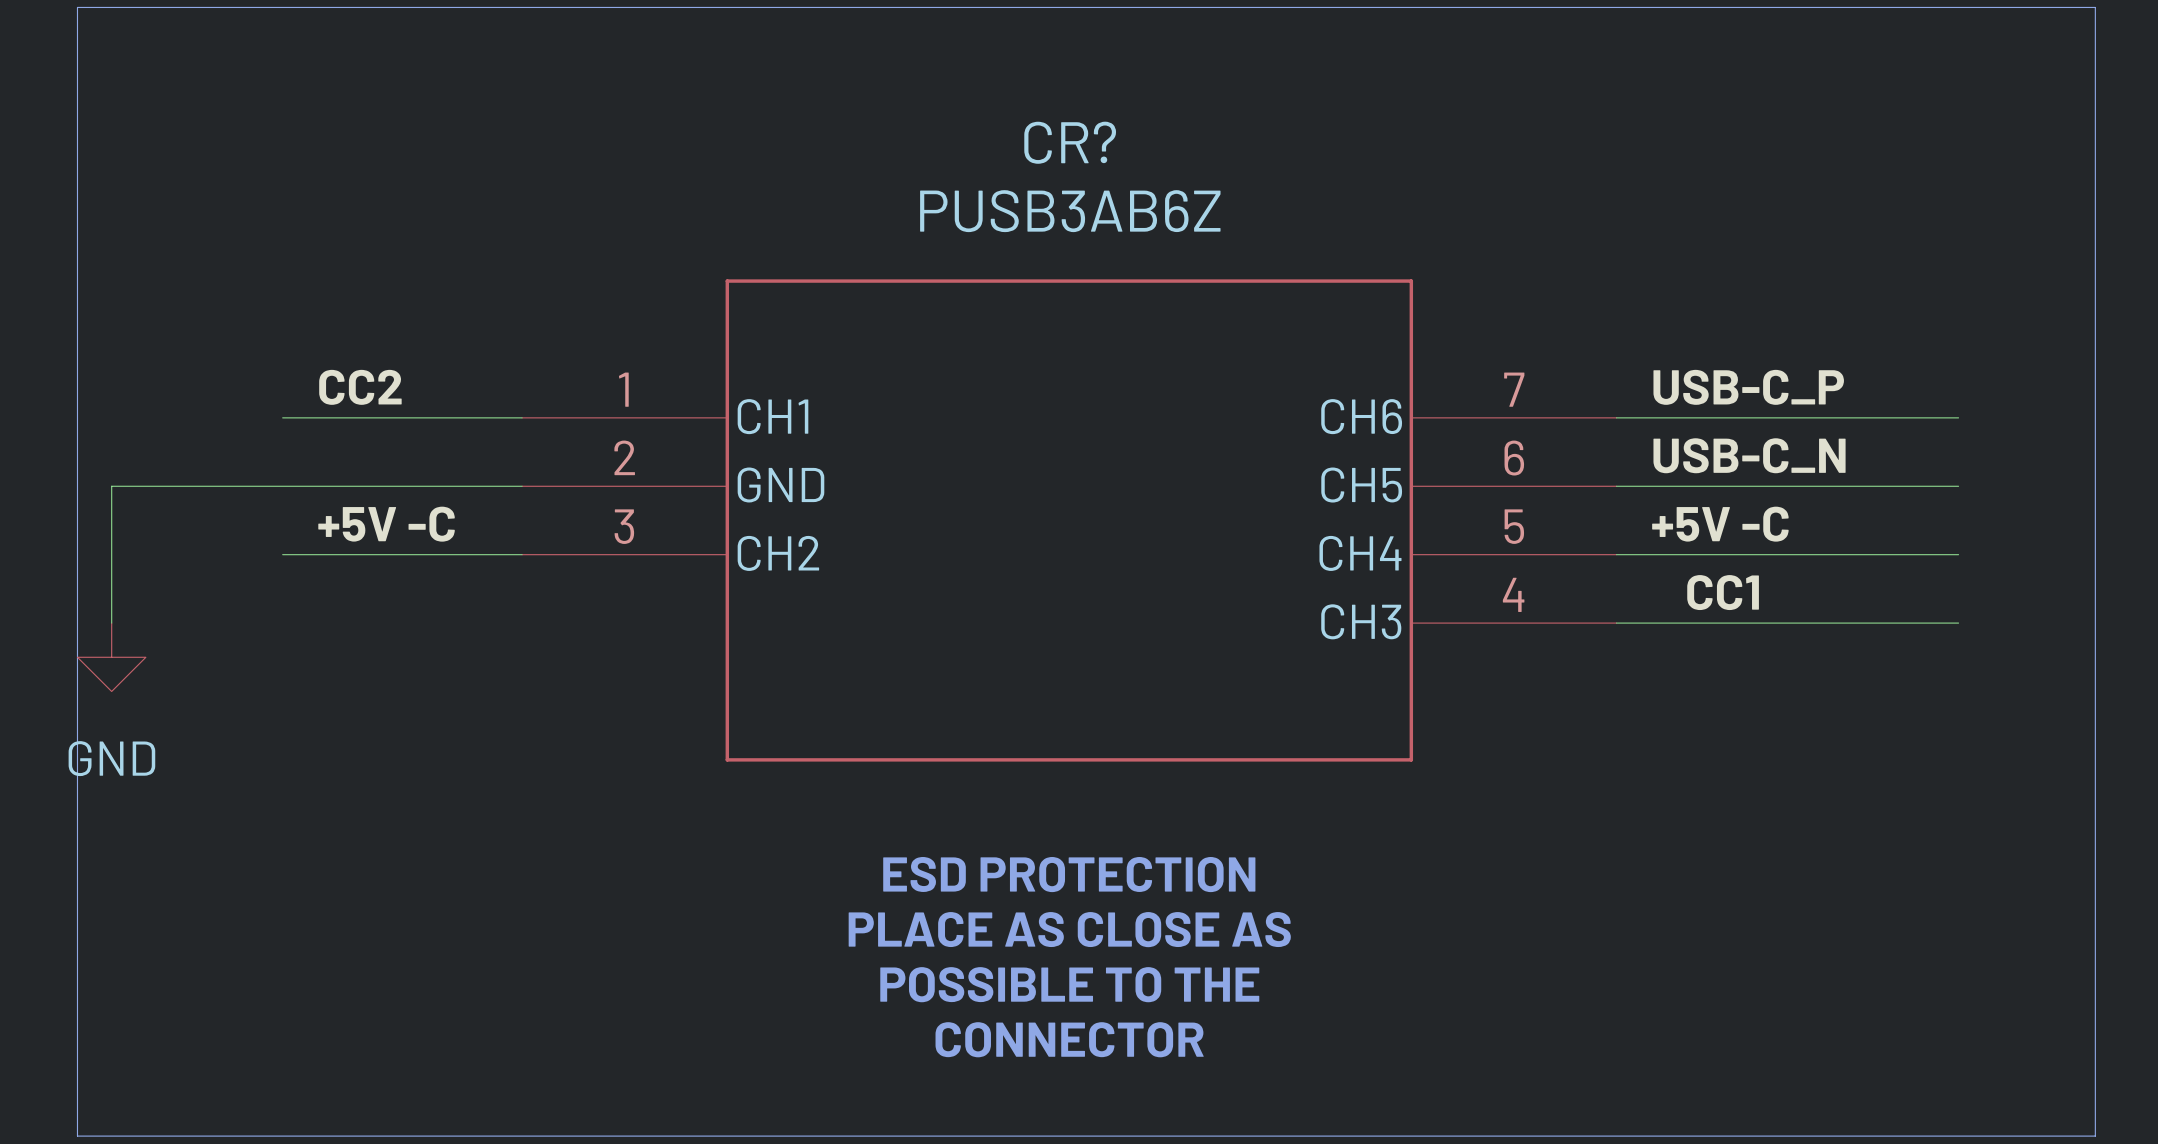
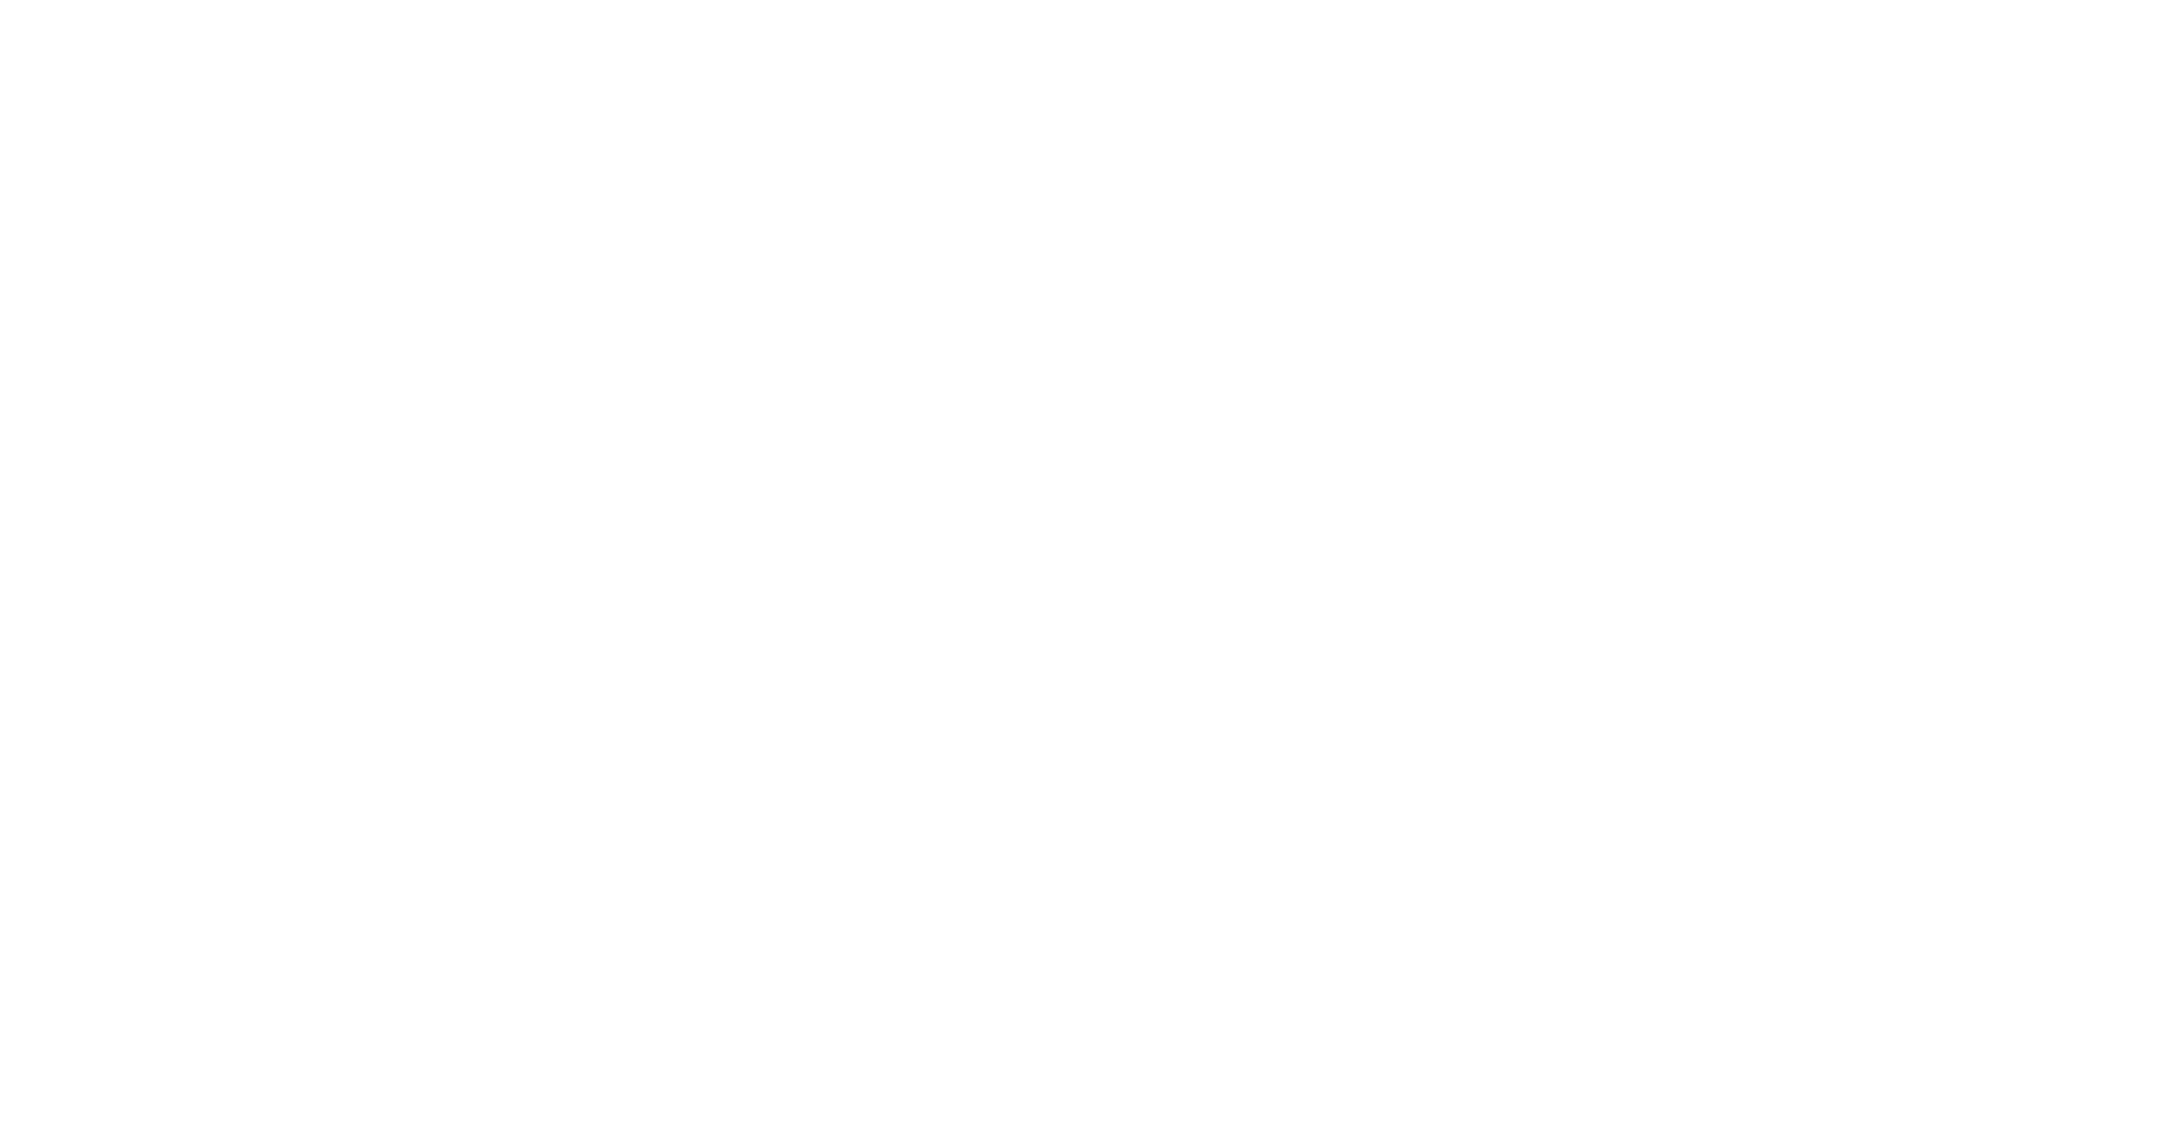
line: (77, 7) (2095, 7) (2095, 1136) (77, 1136) (77, 7) -> none
label: CC2 (360, 387) -> none
label: USB-C_P (1748, 387) -> none
wire: (282, 417) (522, 417) -> none
wire: (1616, 417) (1958, 417) -> none
label: USB-C_N (1749, 455) -> none
wire: (522, 486) (111, 486) (111, 623) -> none
wire: (1616, 486) (1958, 486) -> none
CR?: PUSB3AB6Z (1069, 520) -> none
label: +5V -C (386, 524) -> none
label: +5V -C (1720, 524) -> none
wire: (282, 554) (522, 554) -> none
wire: (1616, 554) (1958, 554) -> none
label: CC1 (1723, 592) -> none
wire: (1616, 623) (1958, 623) -> none
power symbol: GND (111, 657) -> none
text: ESD PROTECTION (1069, 874) -> none
text: PLACE AS CLOSE AS (1069, 929) -> none
text: POSSIBLE TO THE (1069, 984) -> none
text: CONNECTOR (1069, 1039) -> none

